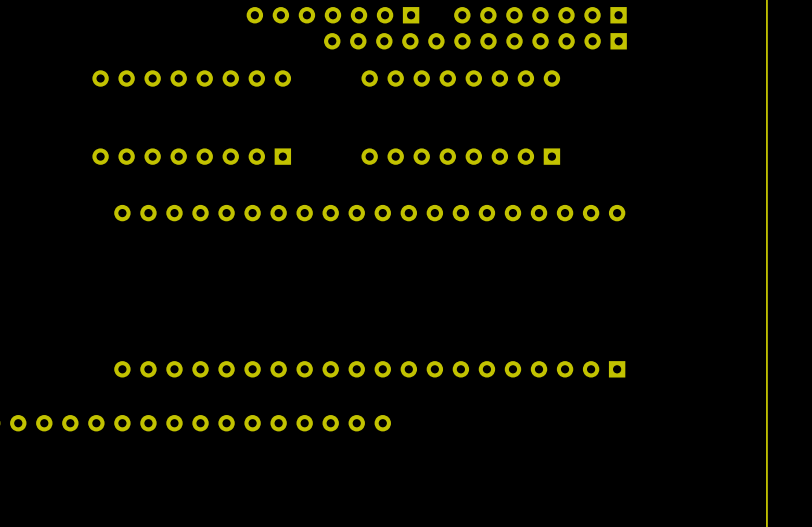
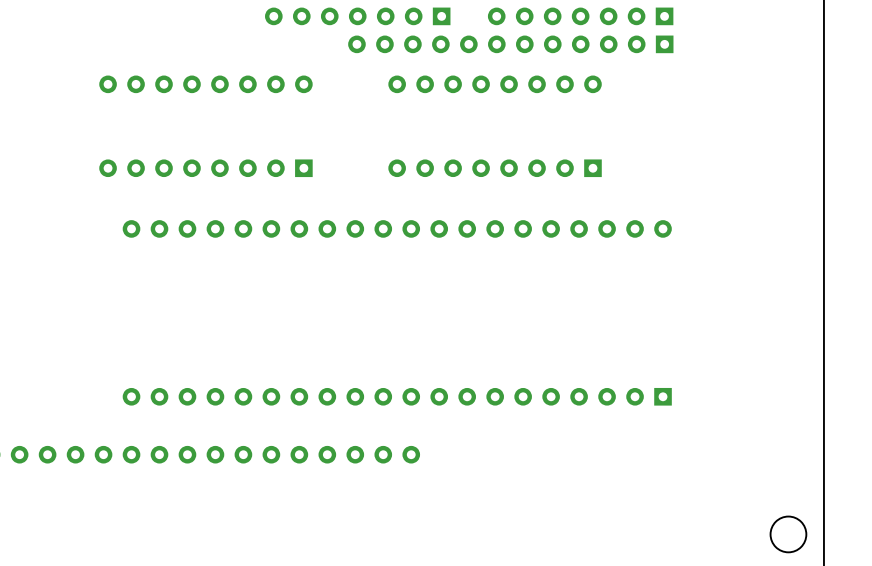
round board edge: none -> [770, 516, 807, 553]

